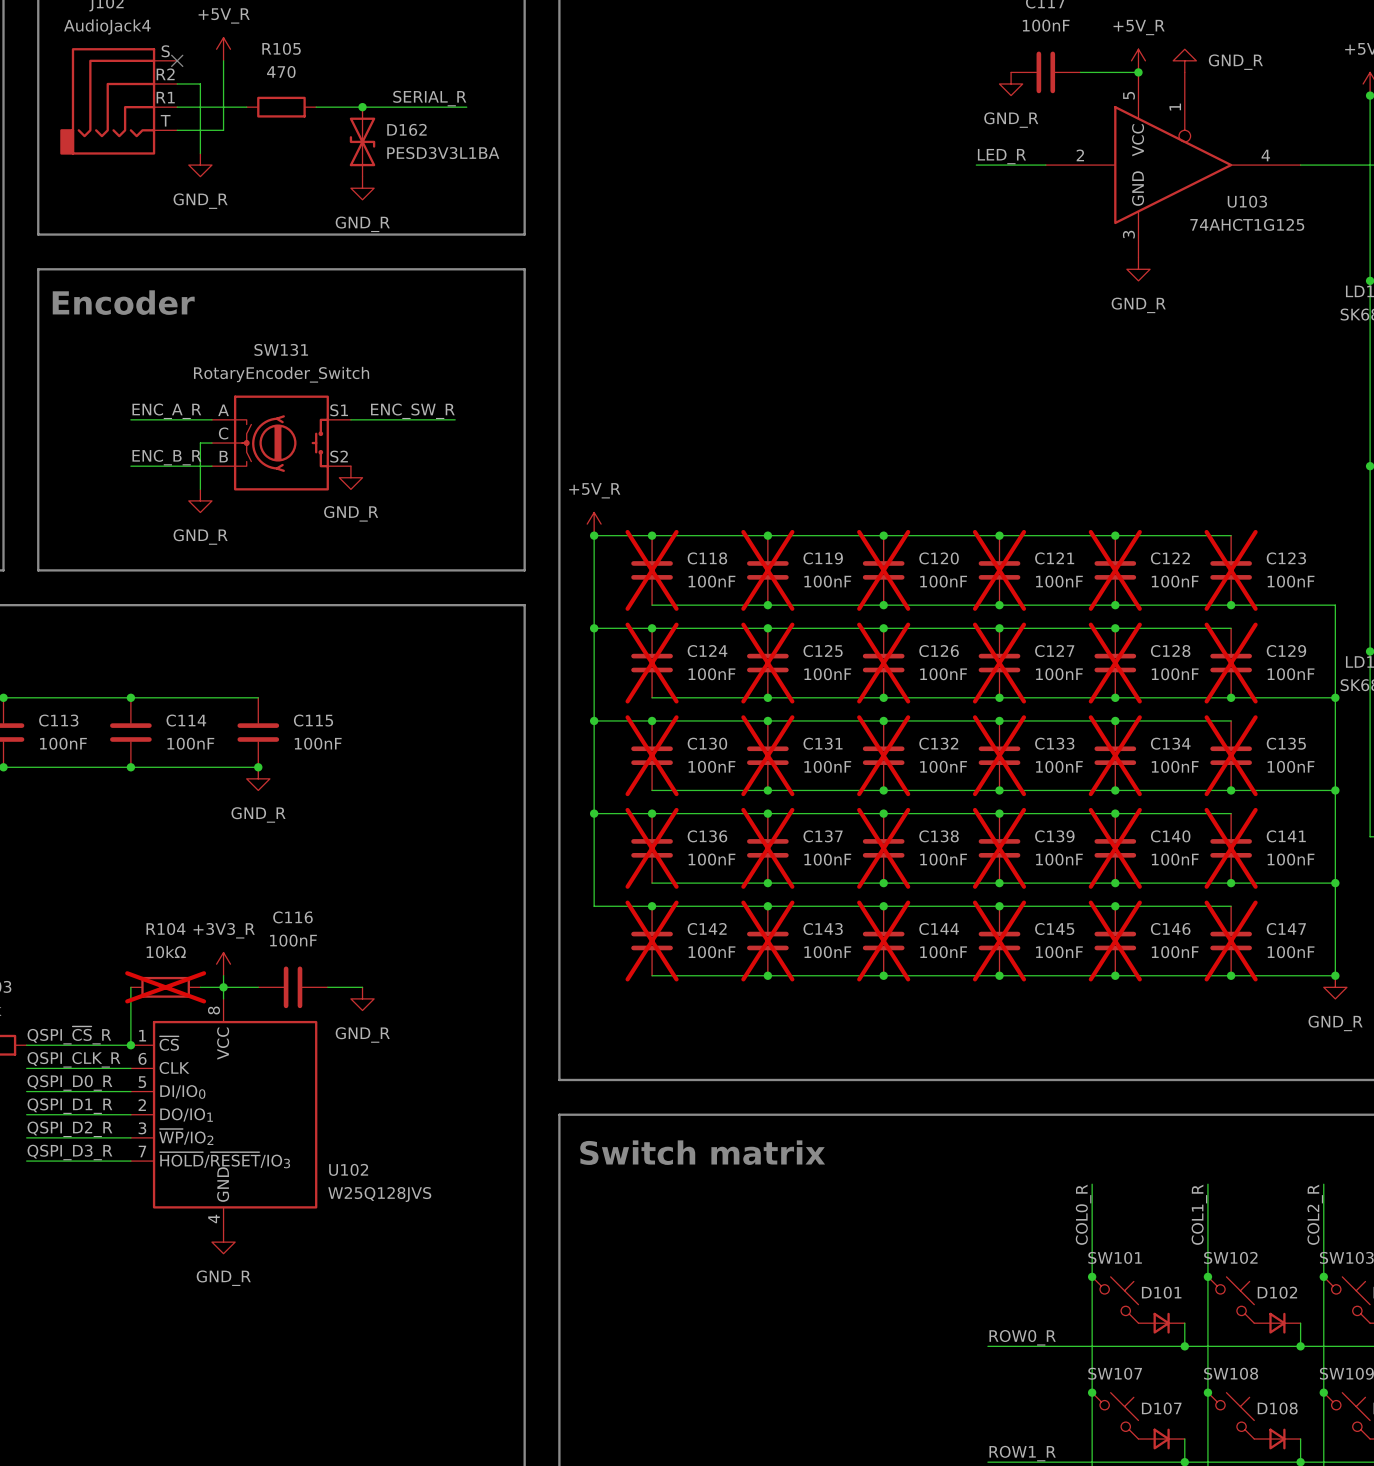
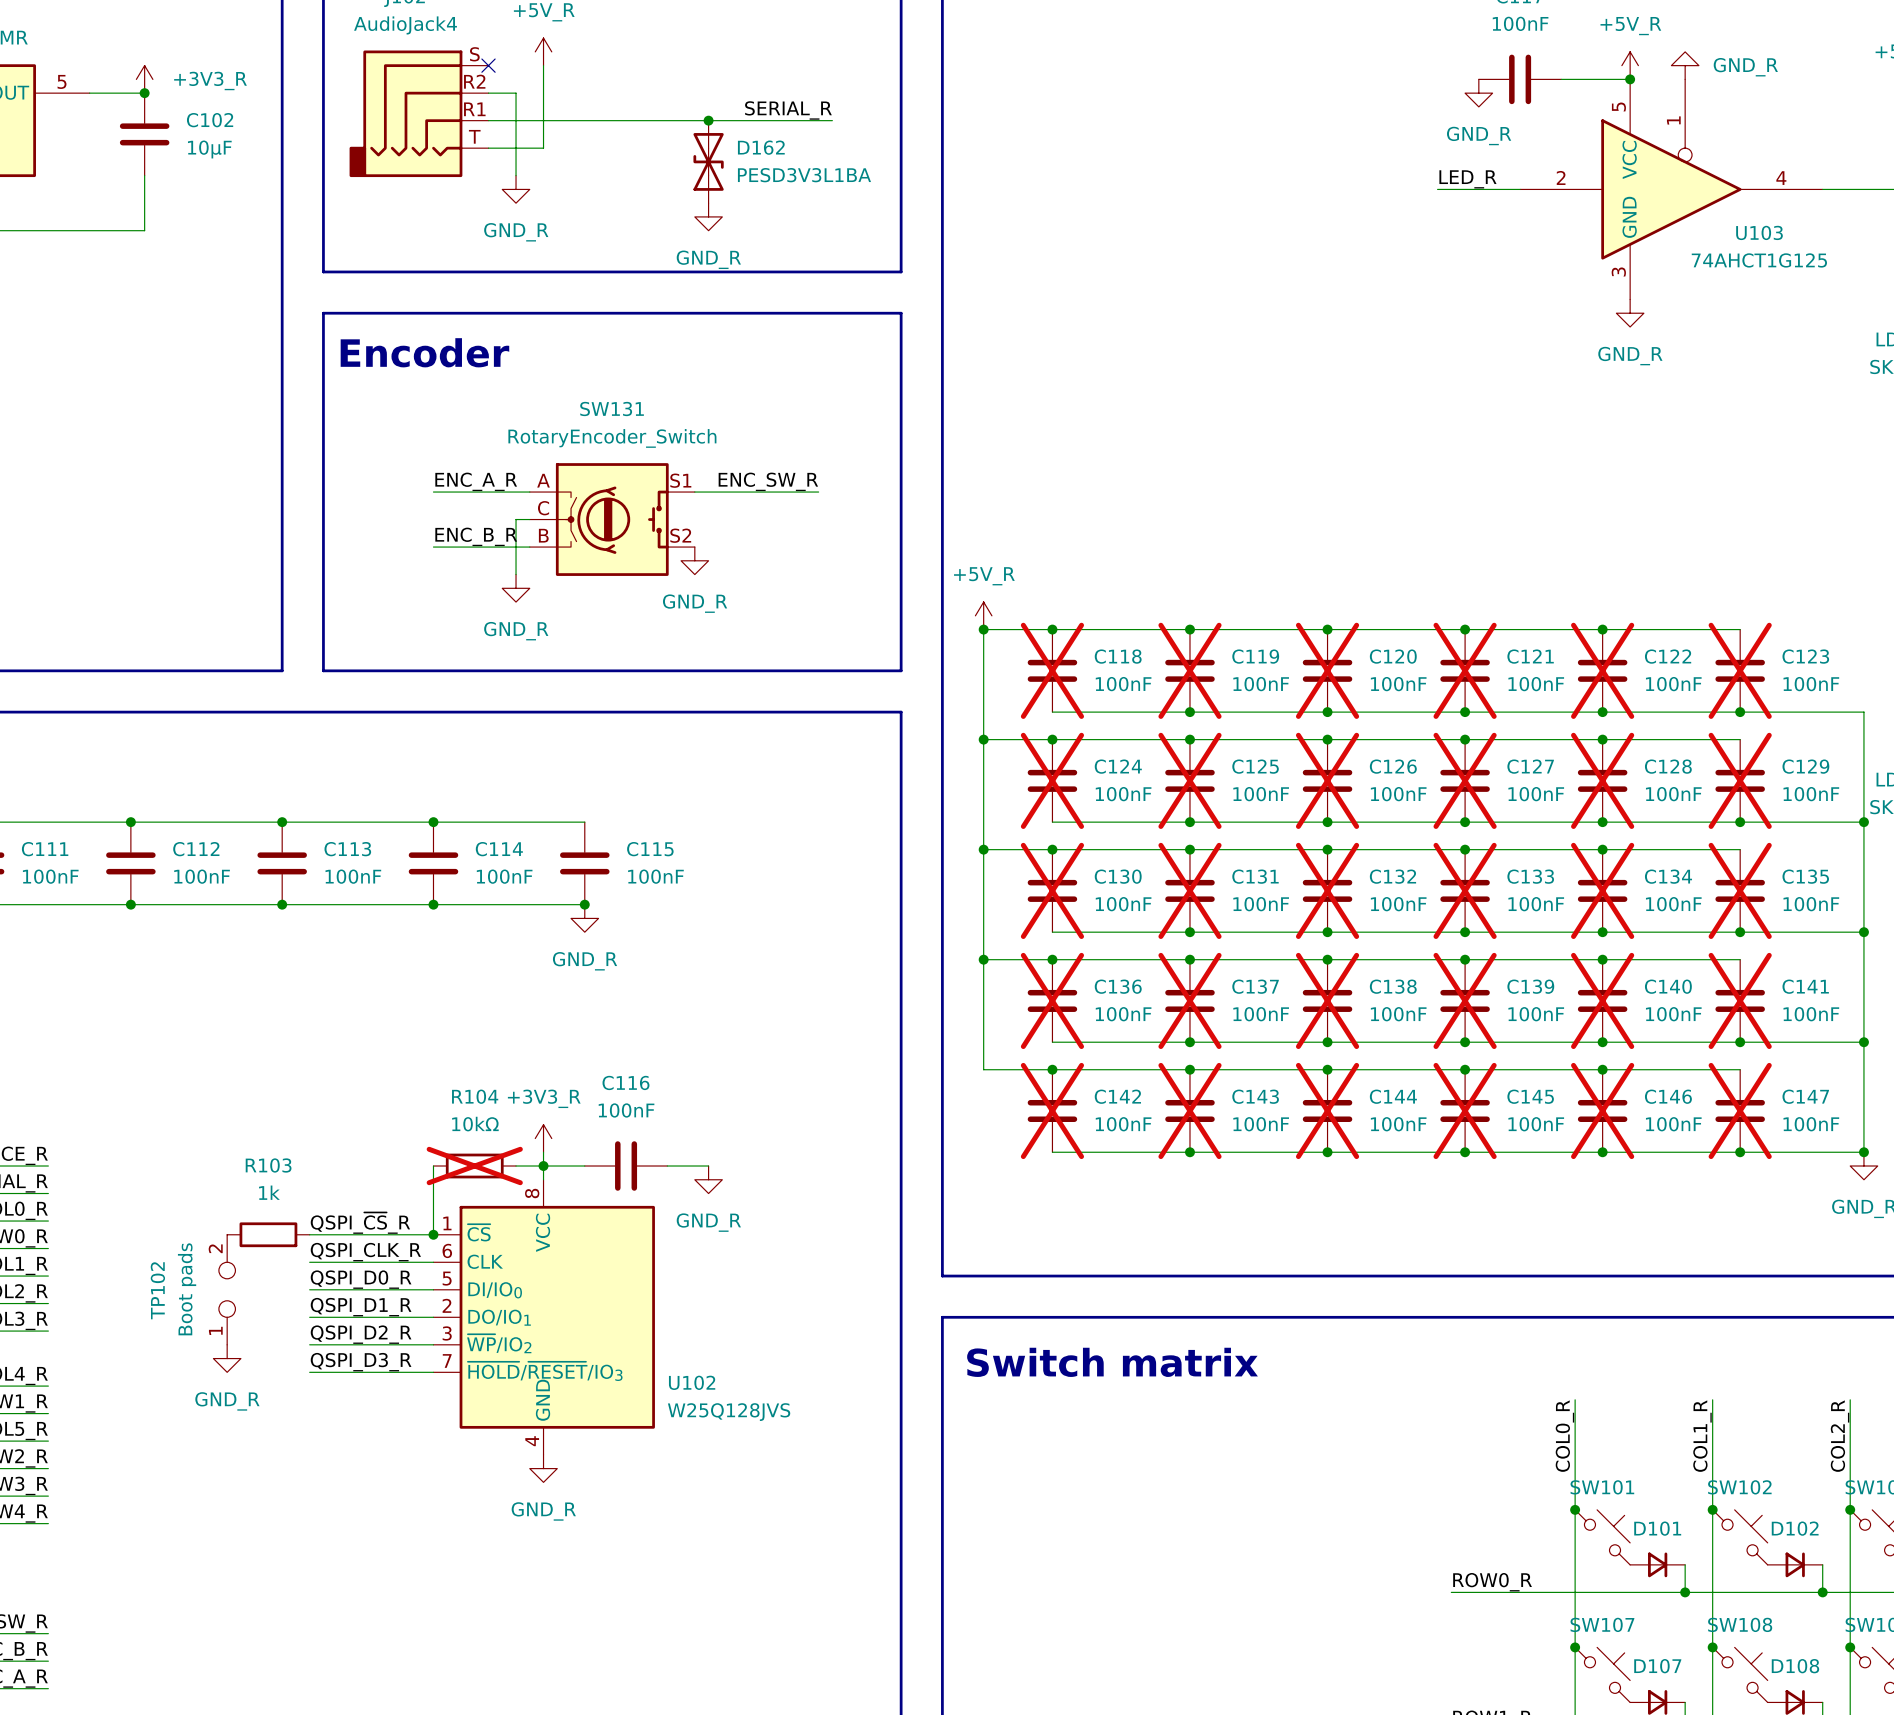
wire: none -> (571, 120) (653, 120)
R105: 470 (281, 107) -> none

